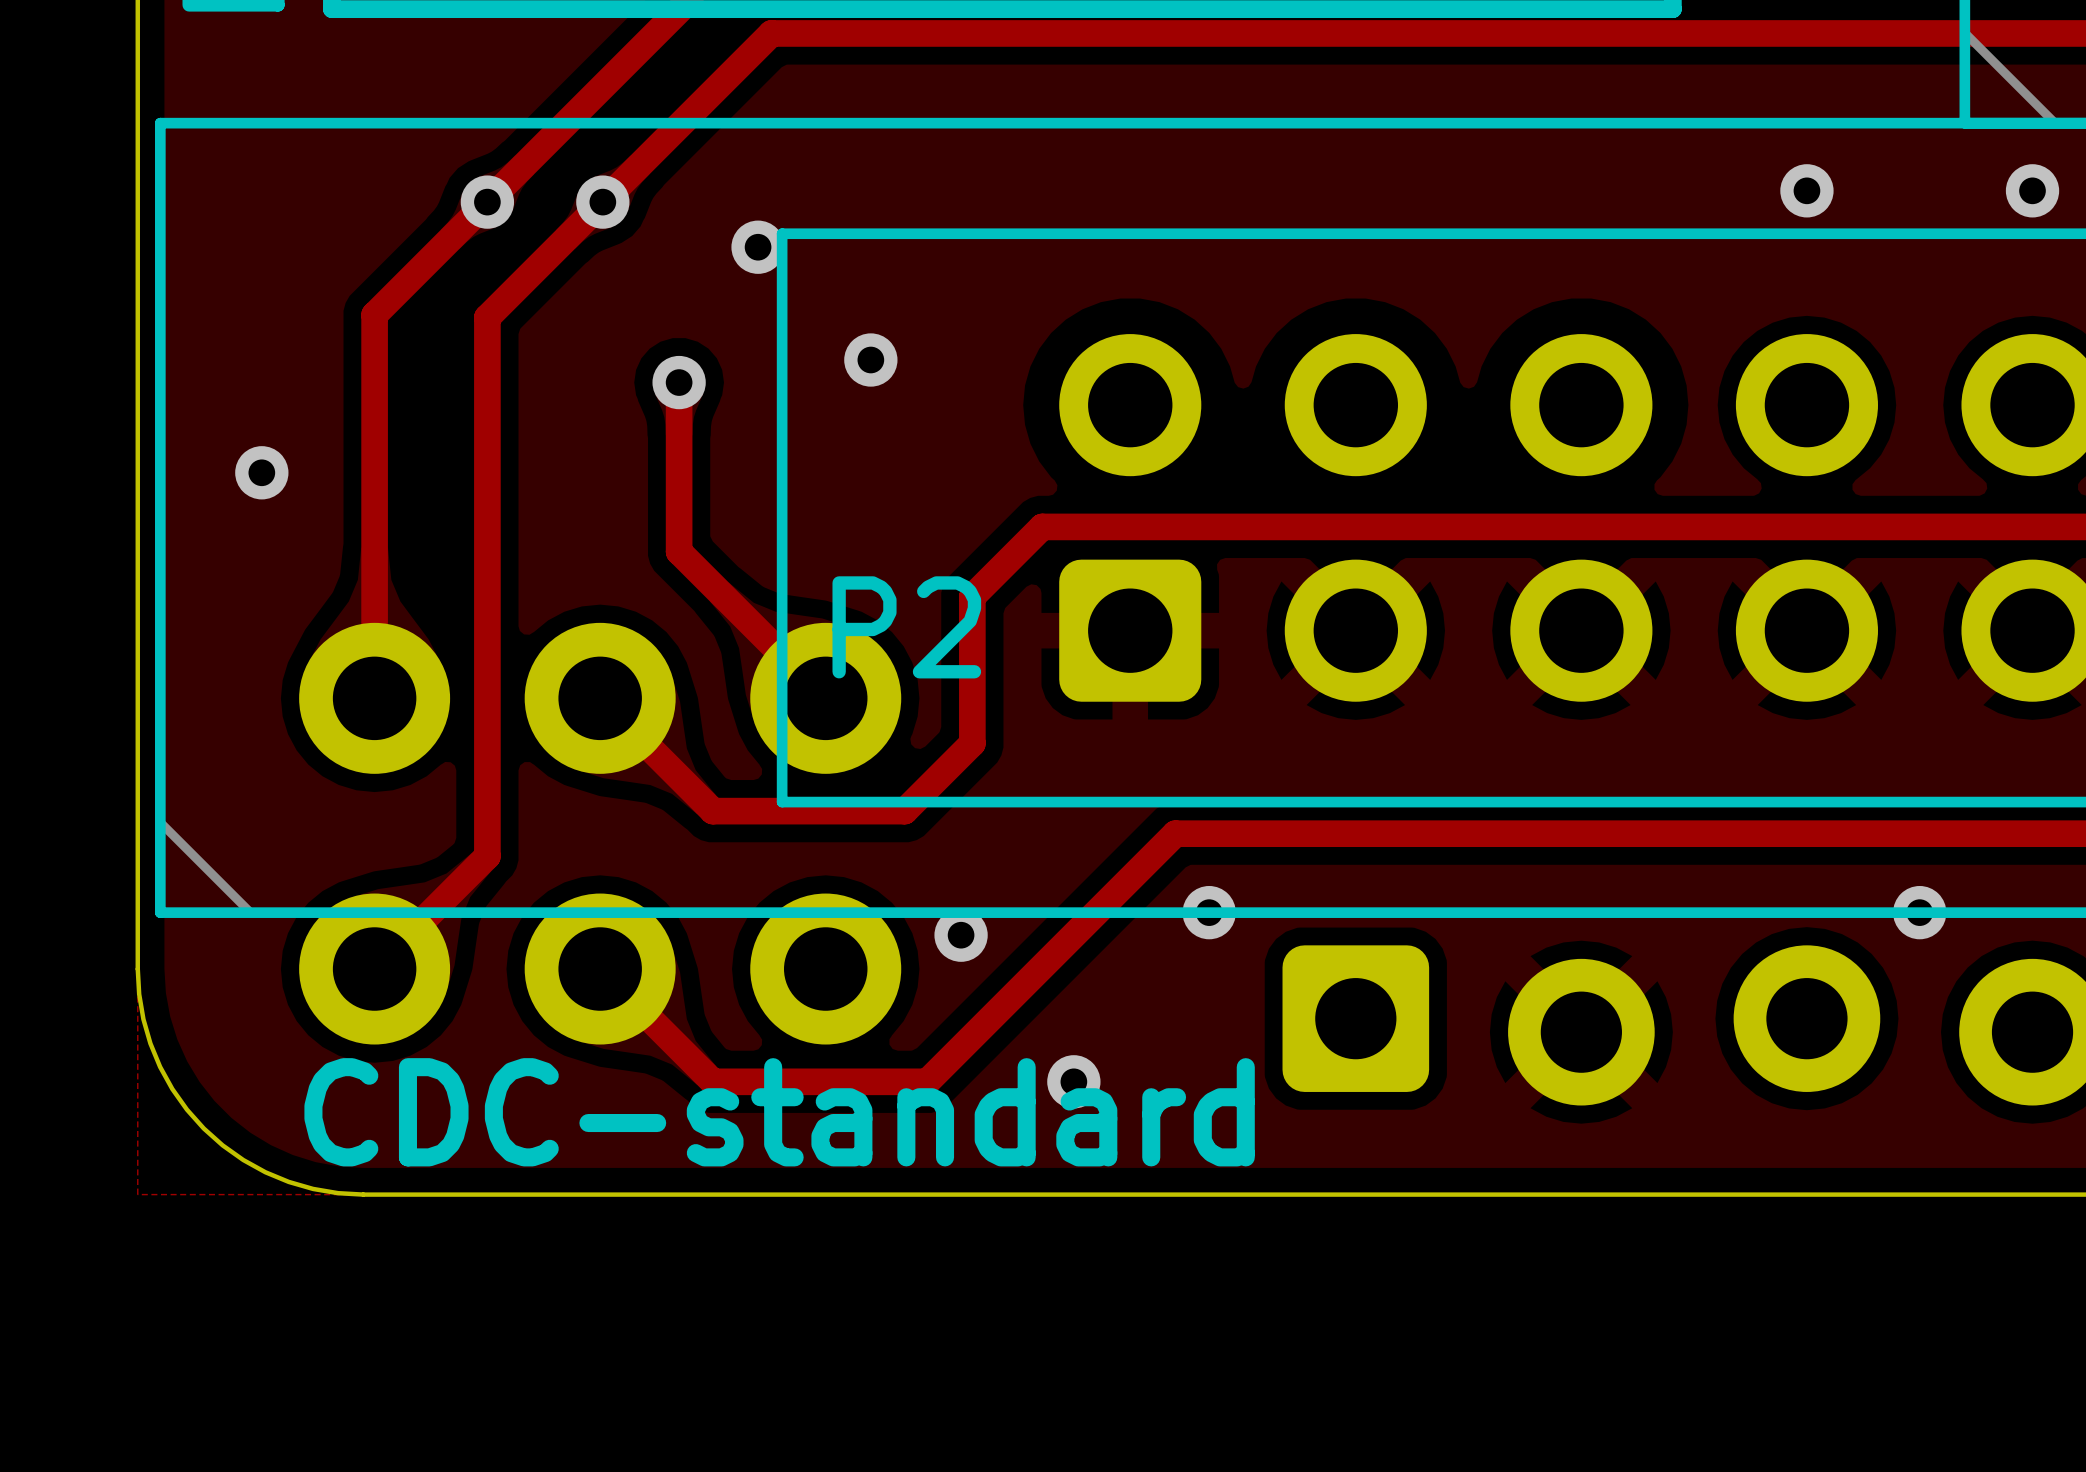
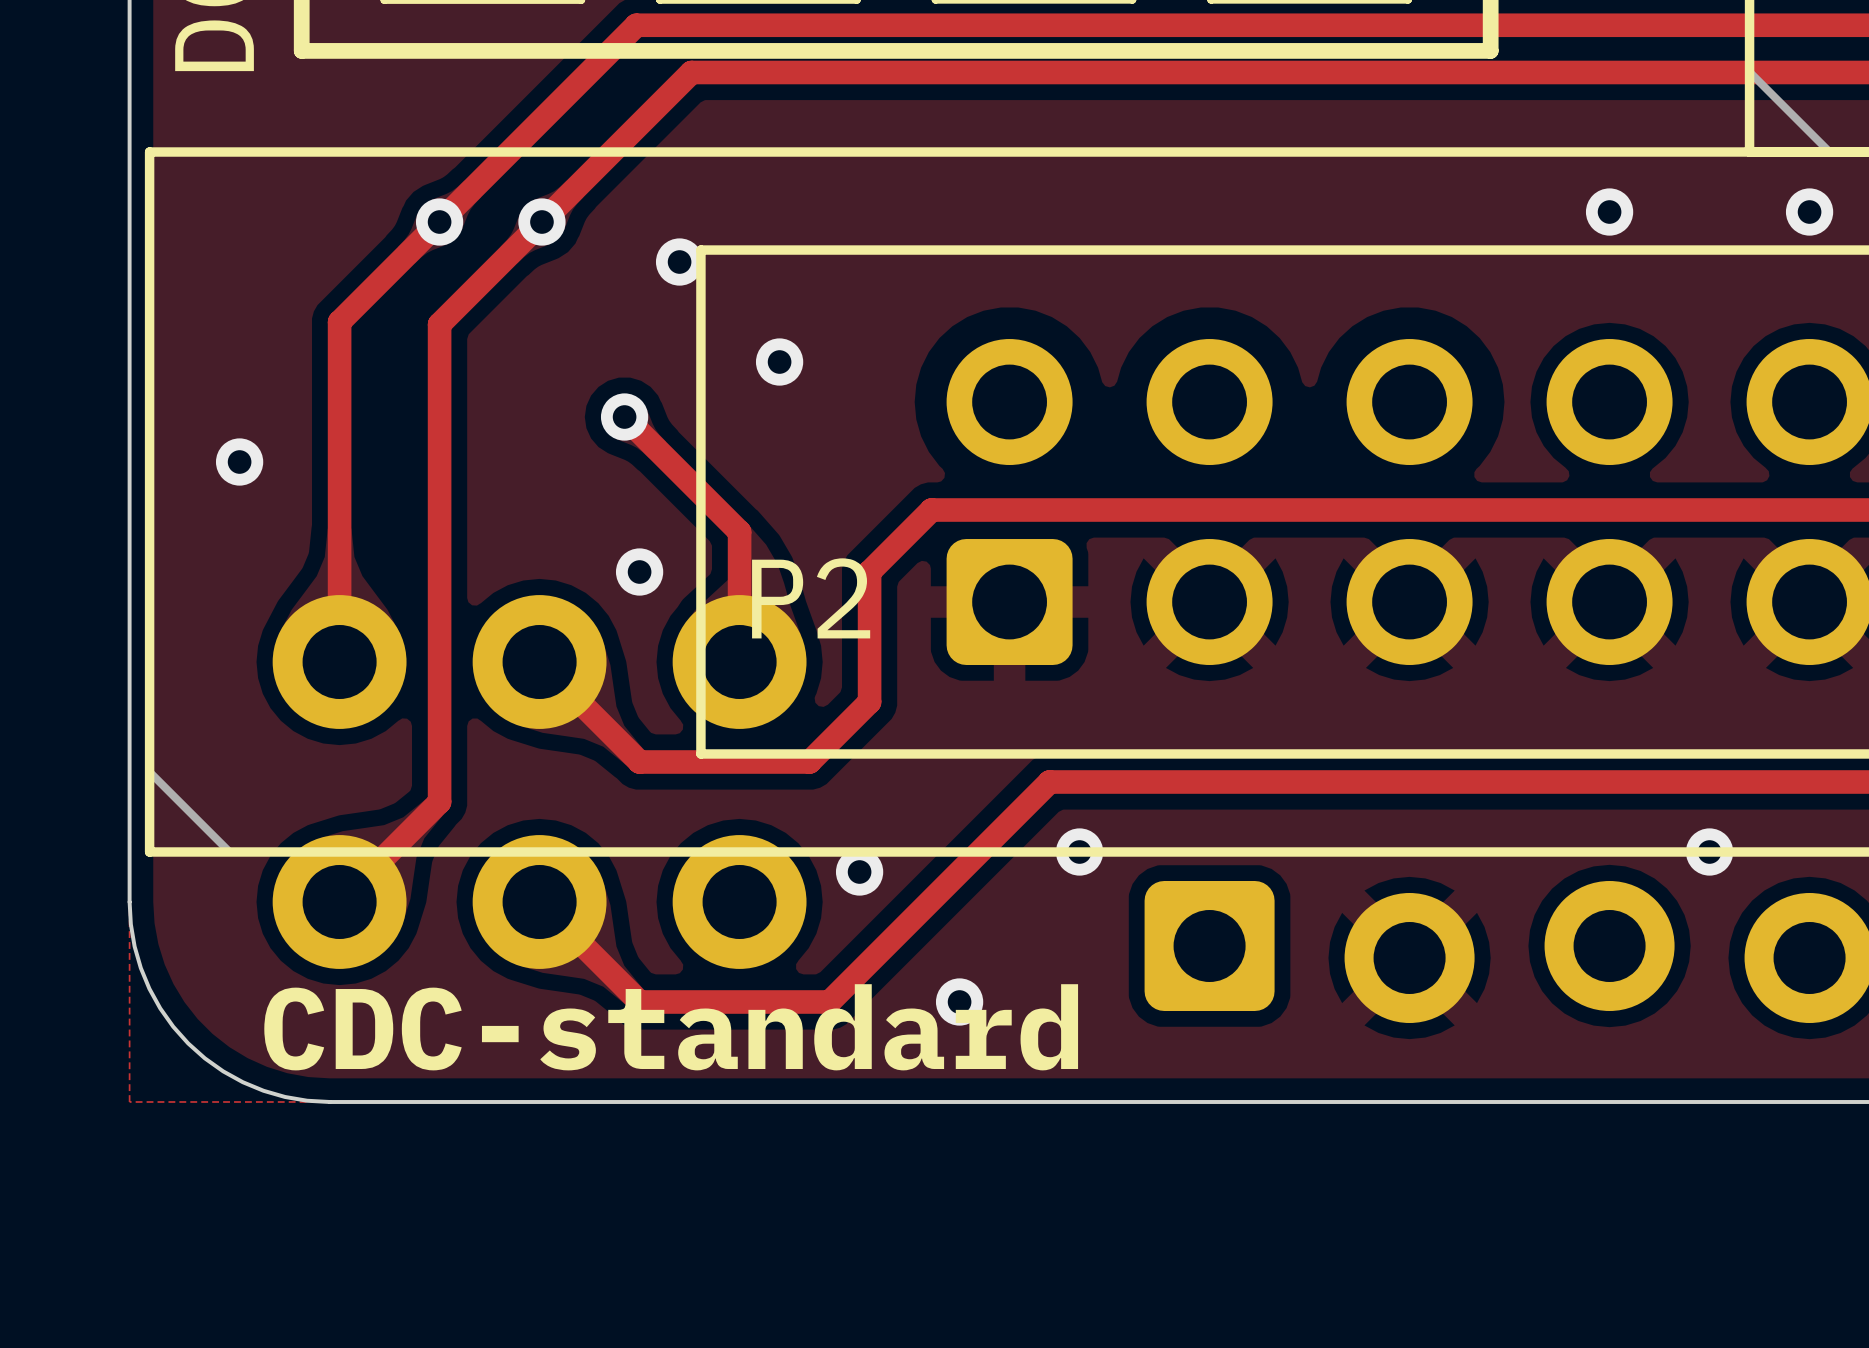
track: (679, 382) (679, 551) (825, 698) -> (624, 417) (739, 532) (739, 662)
via position: (679, 382) -> (624, 417)
via: none -> (639, 572)

